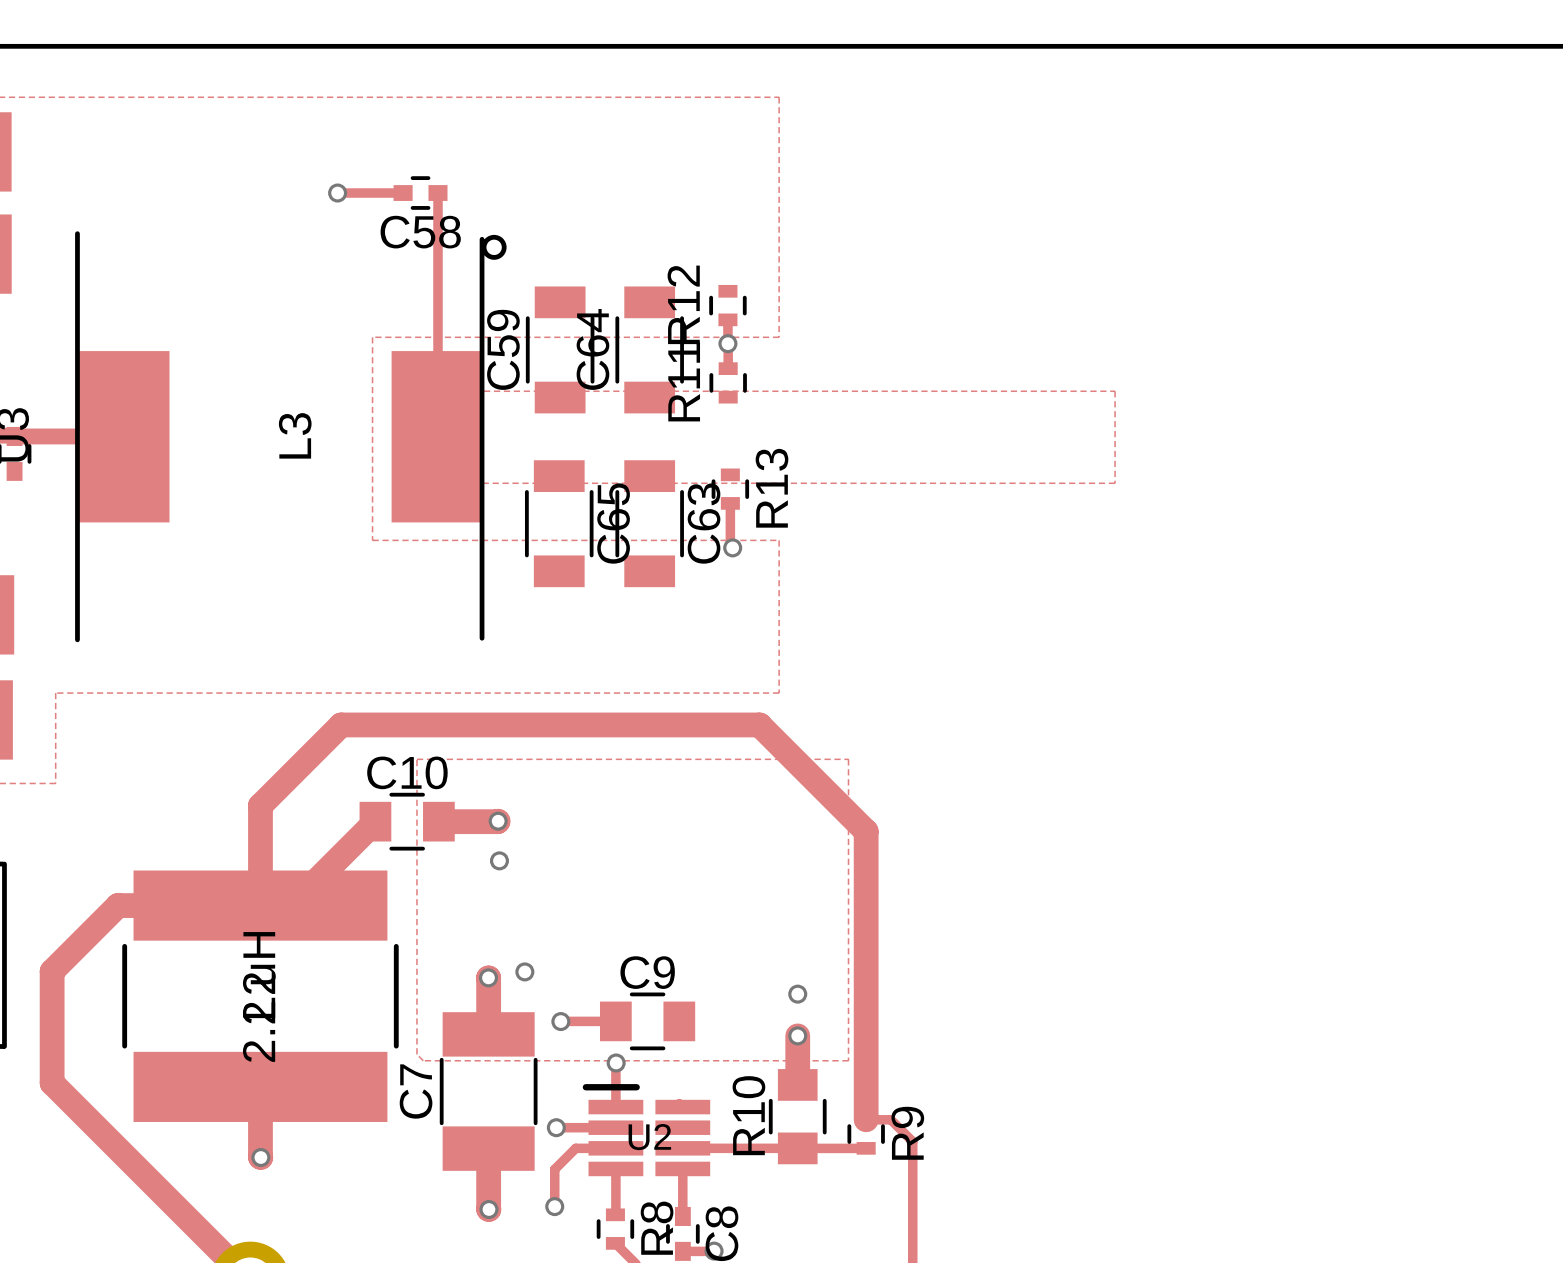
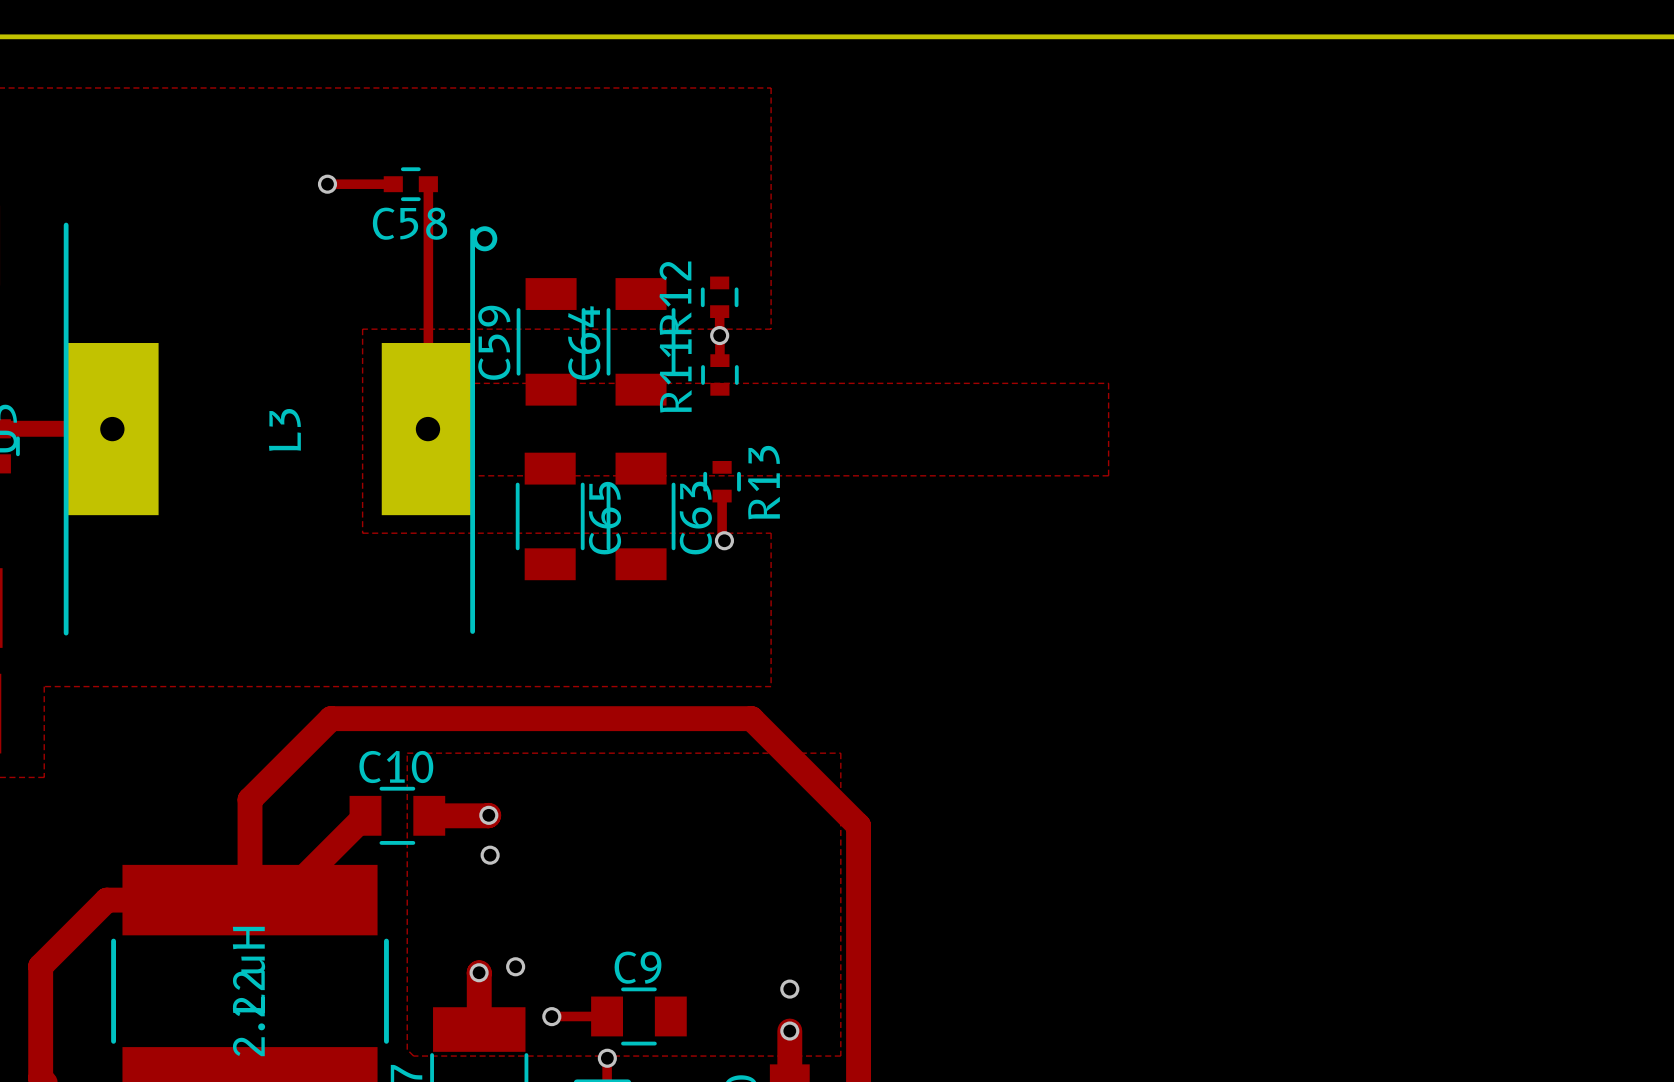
L3 footprint: [75, 231, 507, 643] -> [63, 222, 498, 636]

